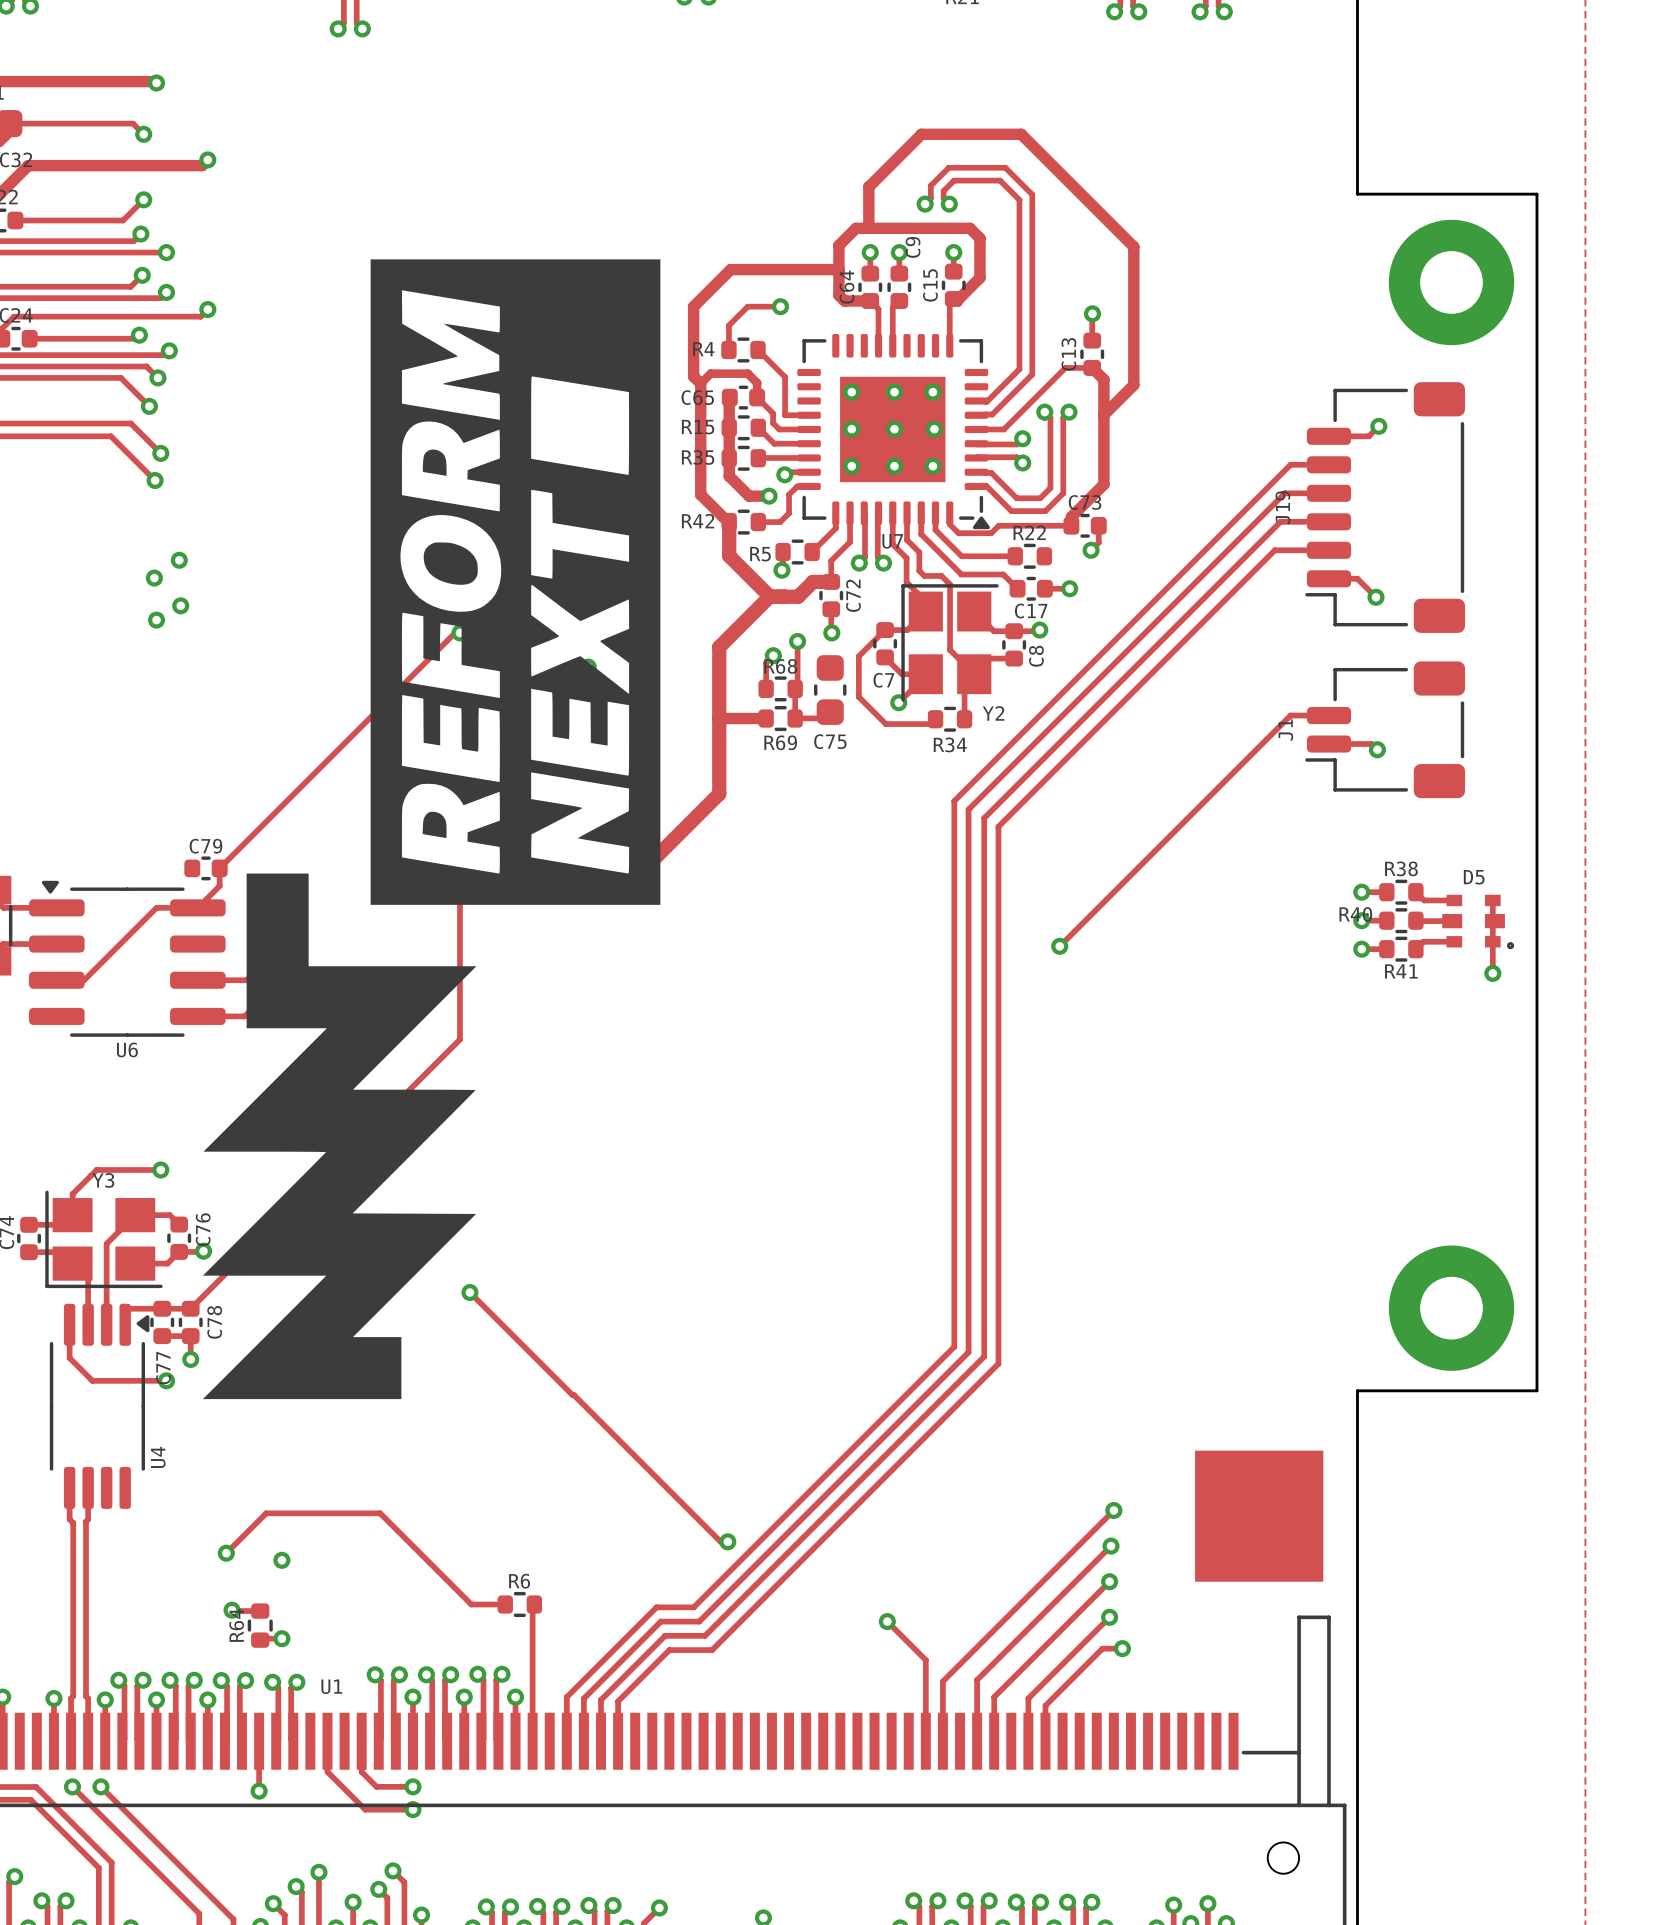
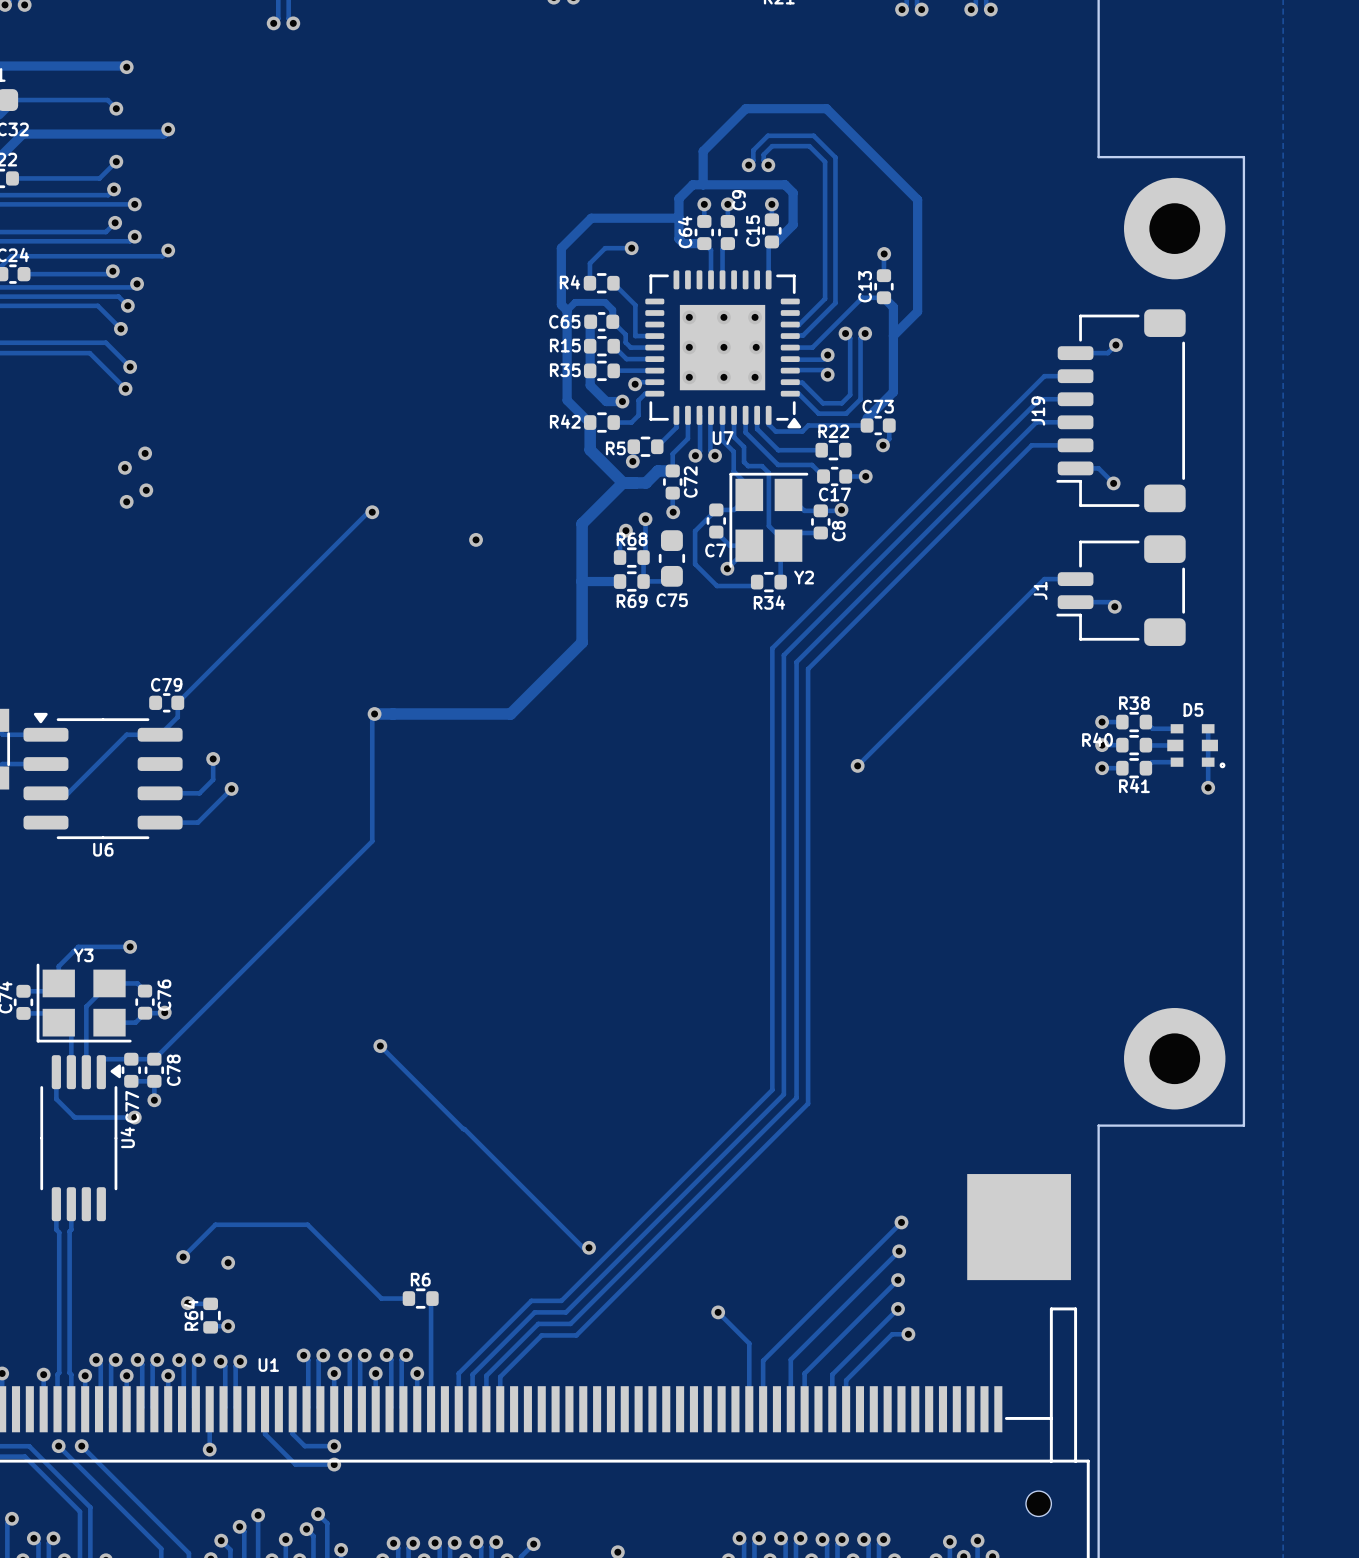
drawing: [202, 259, 661, 1400] -> none
U4 name position: U4 (158, 1457) -> U4 (127, 1137)

